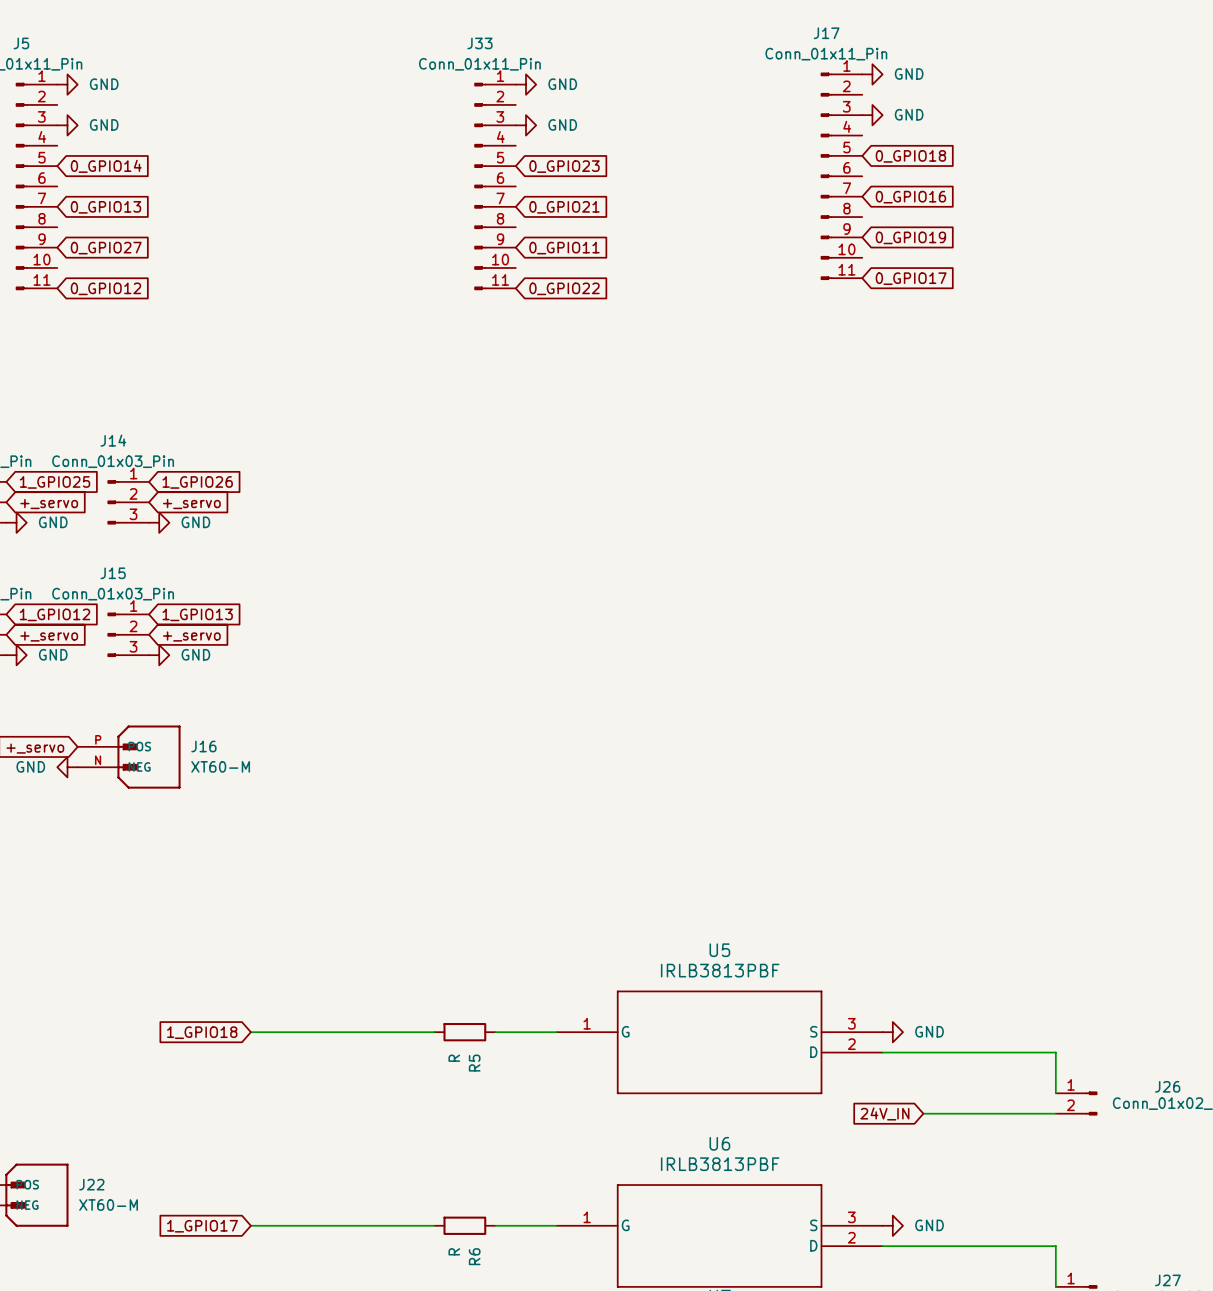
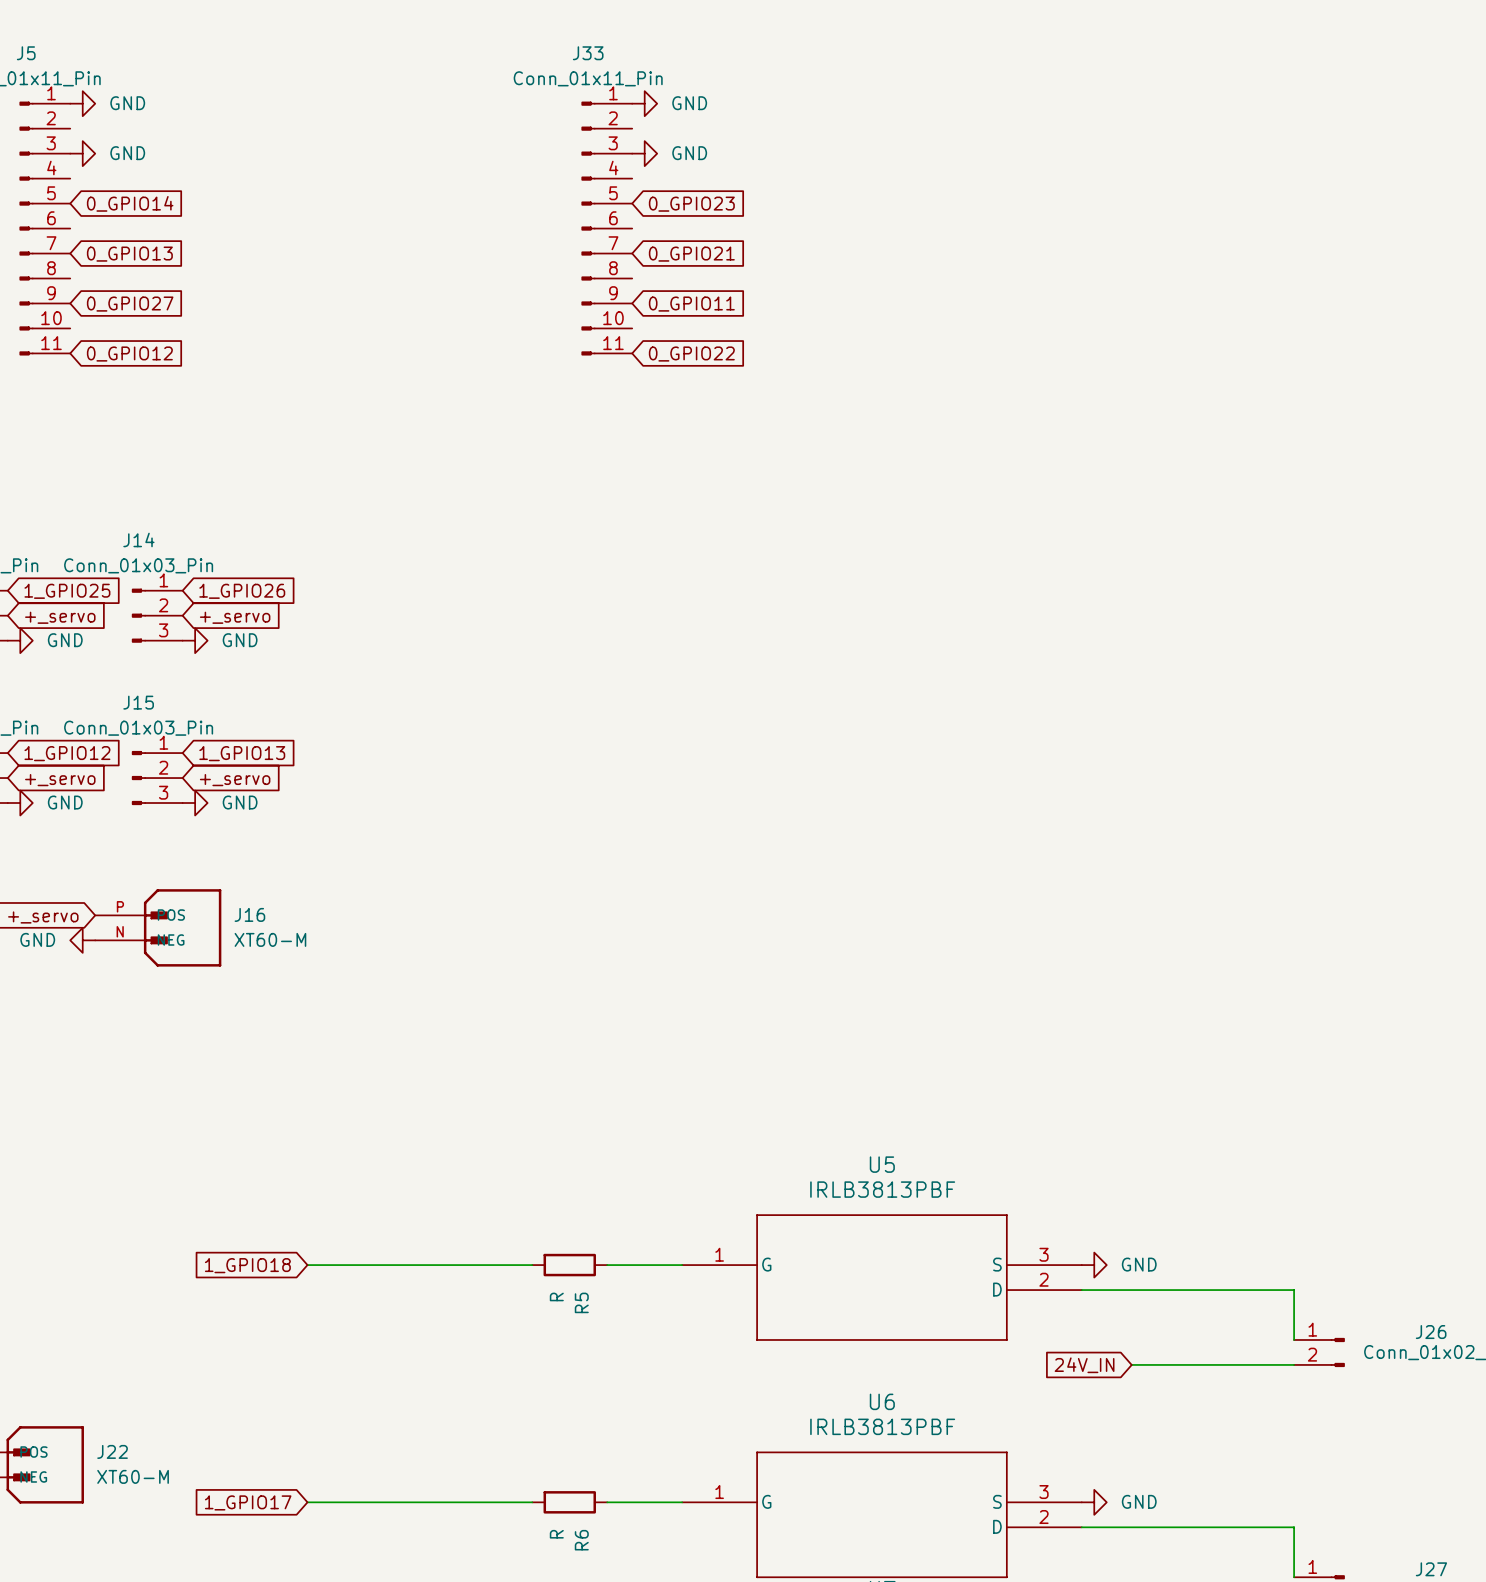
power symbol: GND (872, 74) -> none
power symbol: GND (872, 115) -> none
global label: 0_GPIO18 (910, 156) -> none
J17: Conn_01x11_Pin (841, 176) -> none
global label: 0_GPIO16 (910, 197) -> none
global label: 0_GPIO19 (910, 237) -> none
global label: 0_GPIO17 (911, 278) -> none

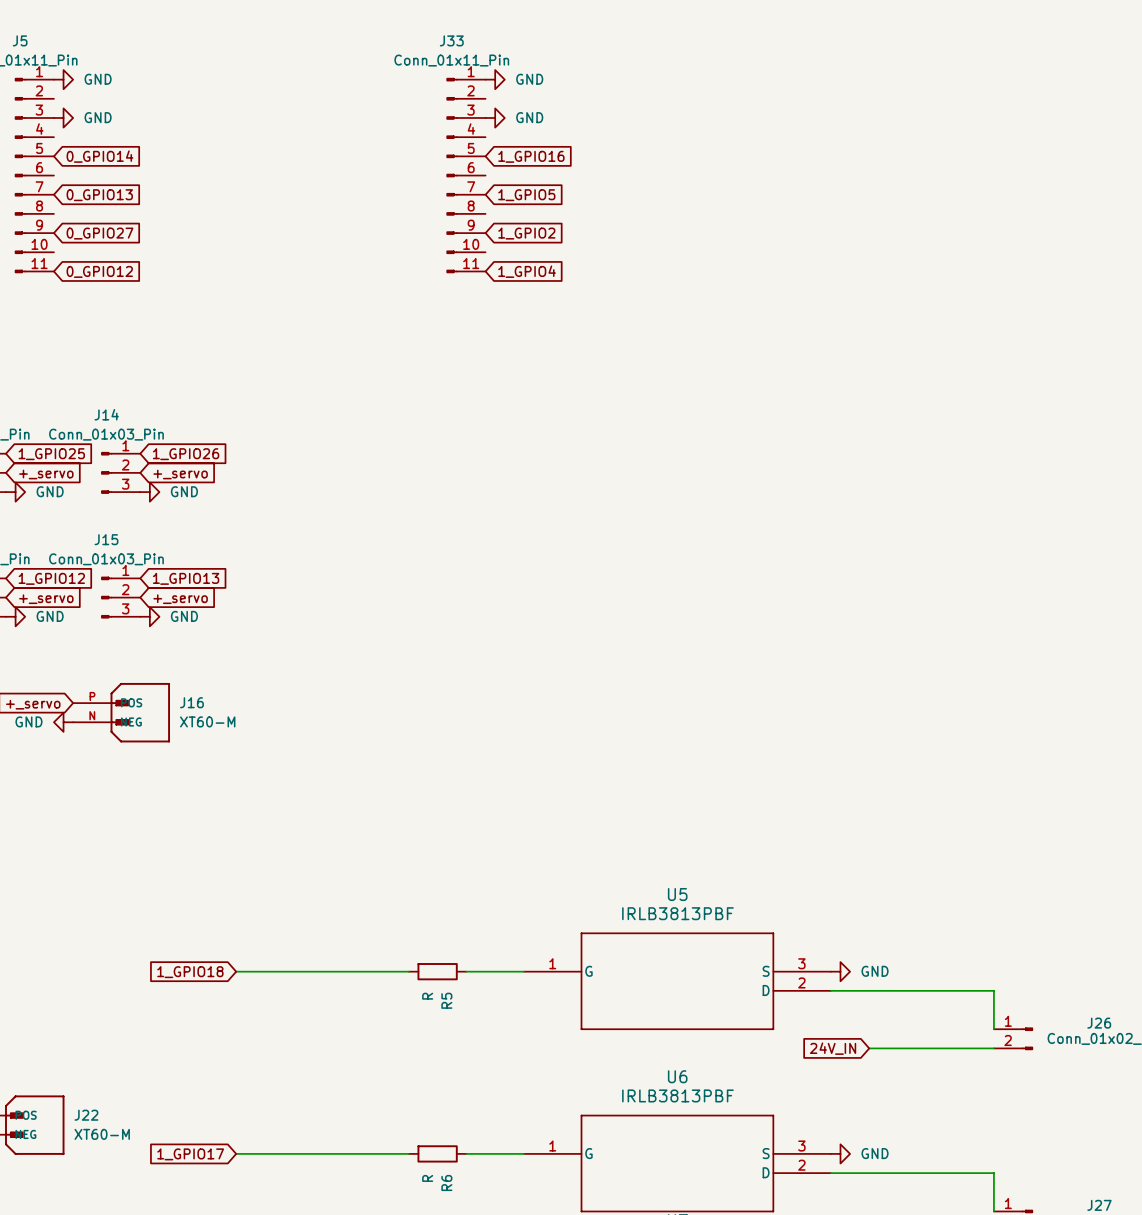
global label: 0_GPIO23 (691, 204) -> 1_GPIO16 (531, 156)
global label: 0_GPIO21 (691, 254) -> 1_GPIO5 (526, 195)
global label: 0_GPIO11 (691, 304) -> 1_GPIO2 (526, 233)
global label: 0_GPIO22 (691, 354) -> 1_GPIO4 (527, 271)

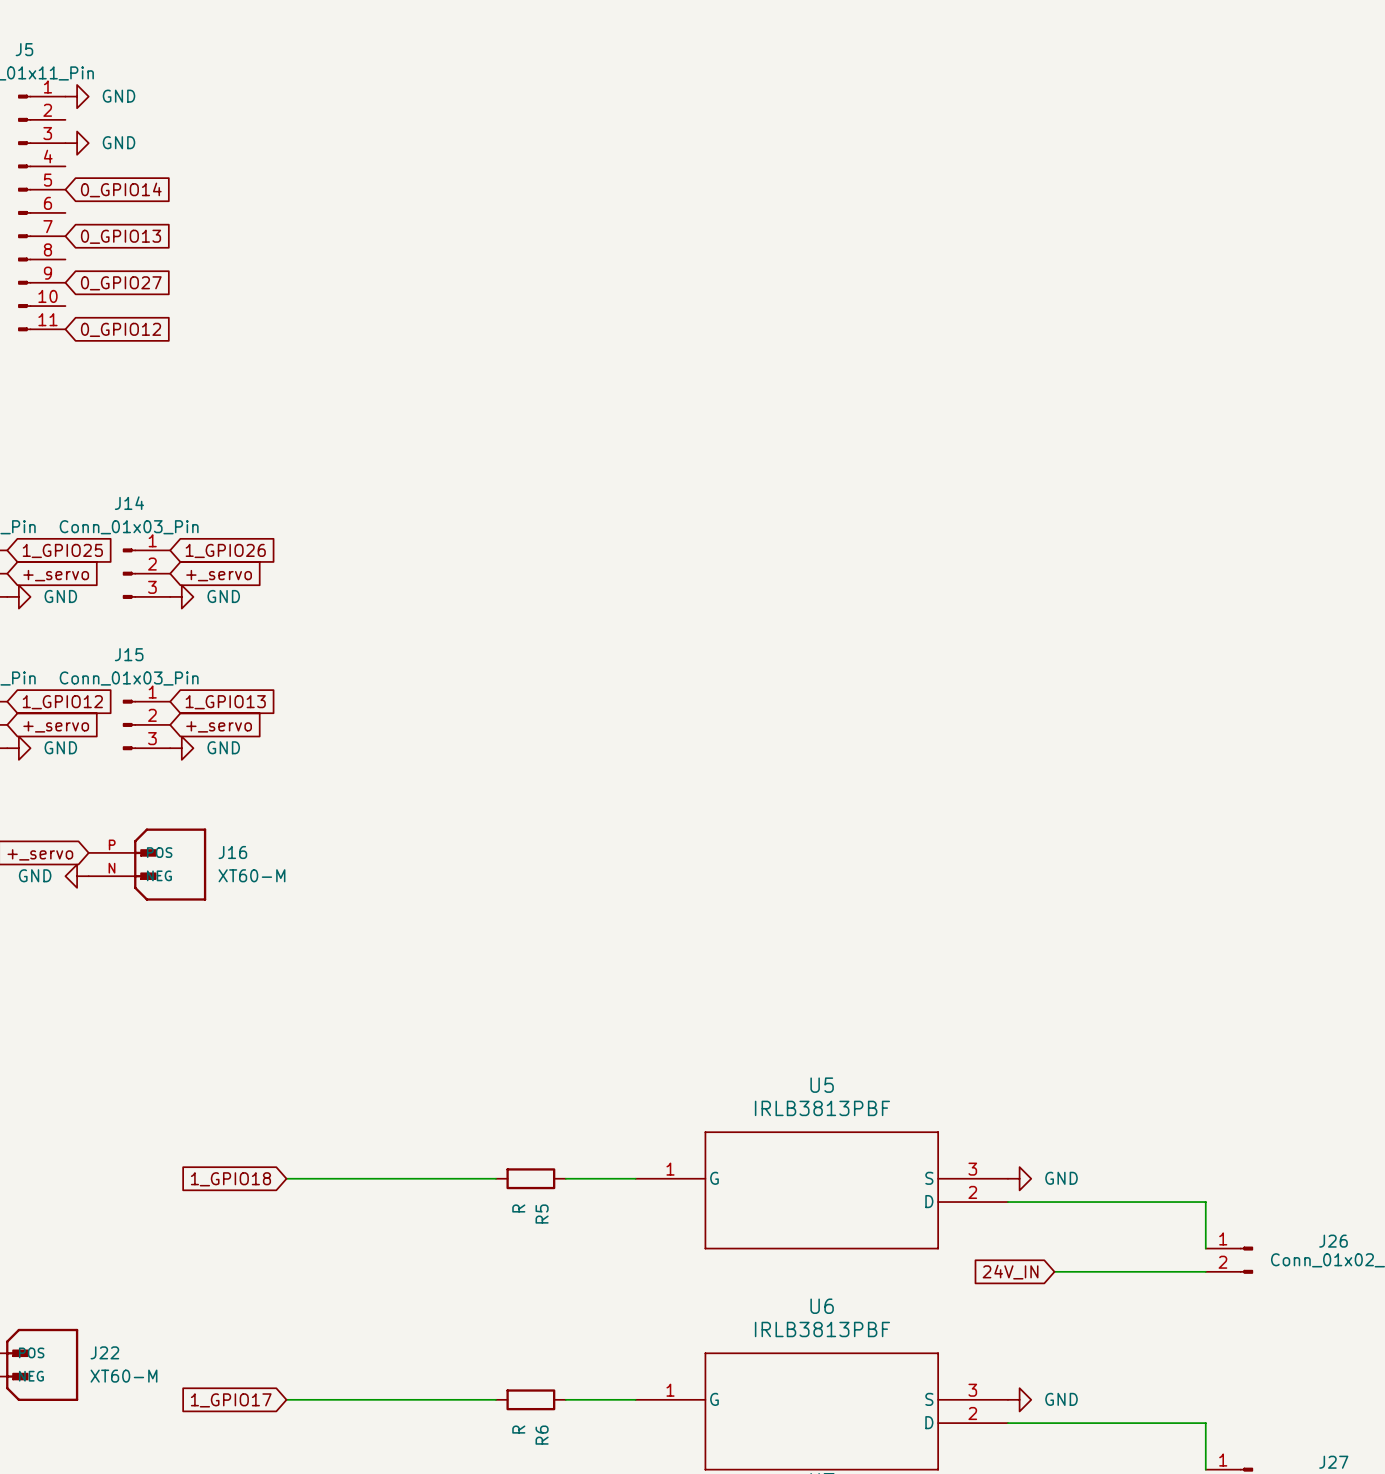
power symbol: GND (495, 79) -> none
power symbol: GND (495, 117) -> none
global label: 1_GPIO16 (531, 156) -> none
J33: Conn_01x11_Pin (466, 175) -> none
global label: 1_GPIO5 (526, 195) -> none
global label: 1_GPIO2 (526, 233) -> none
global label: 1_GPIO4 (527, 271) -> none

